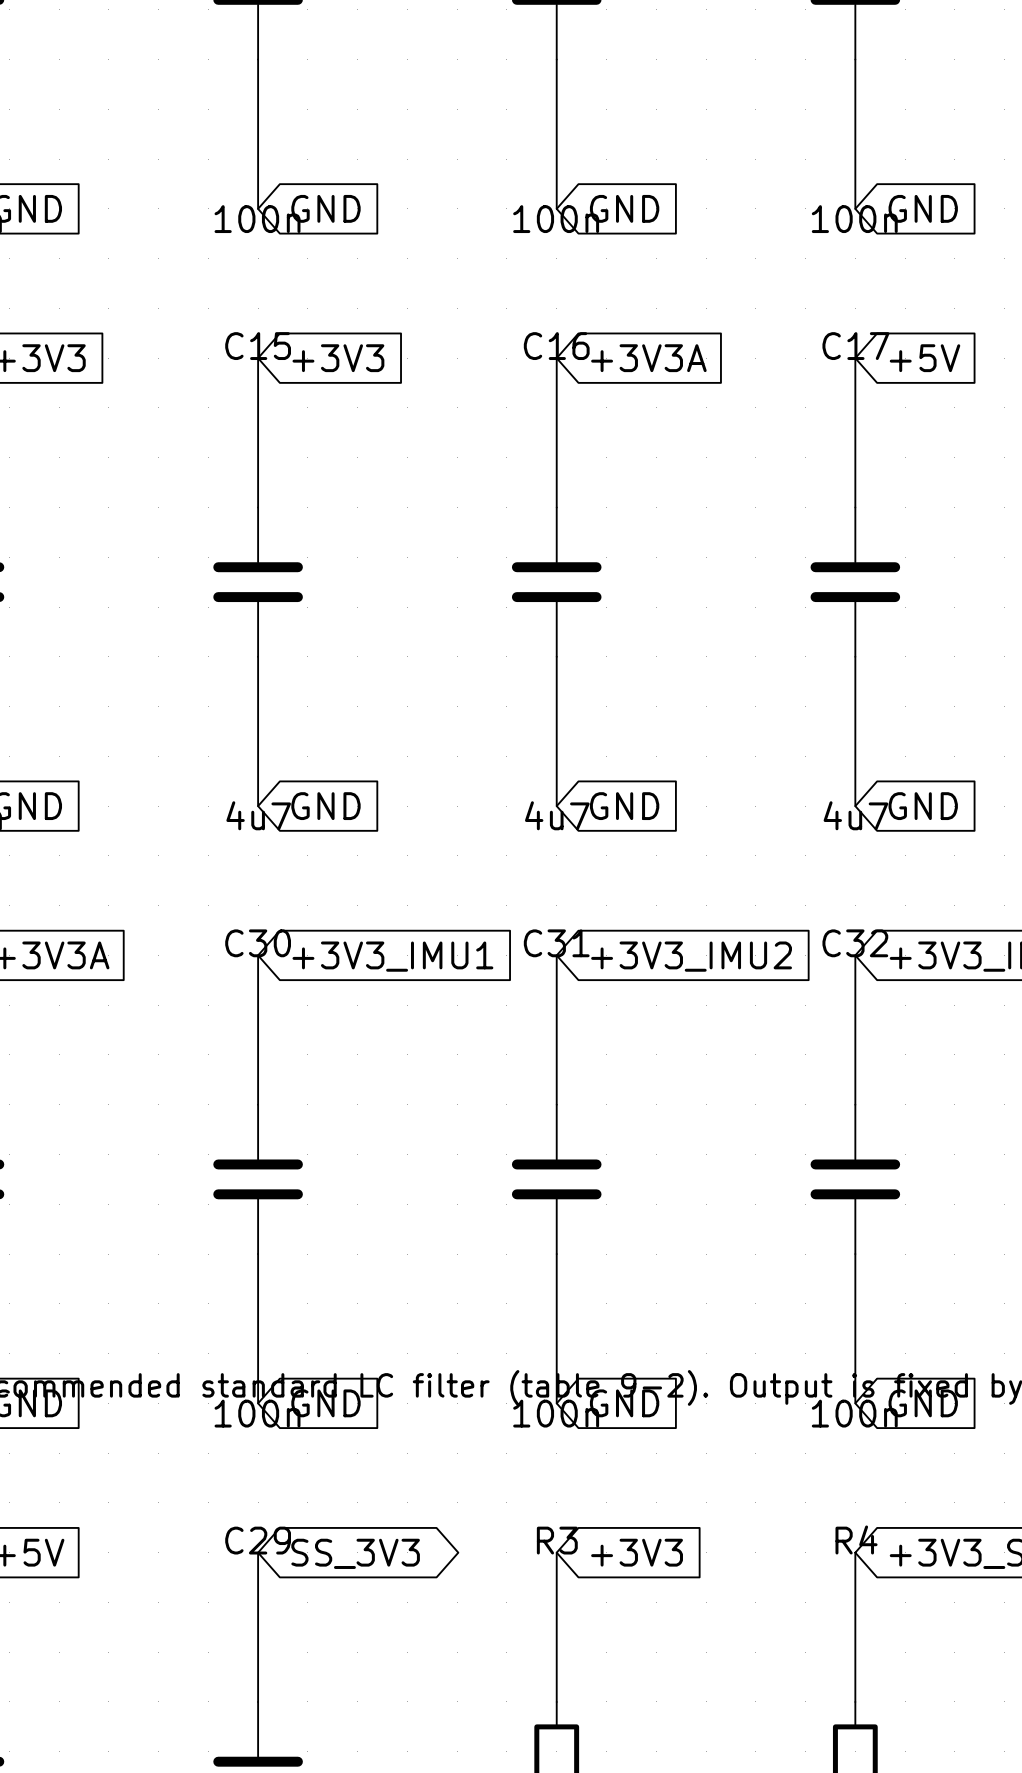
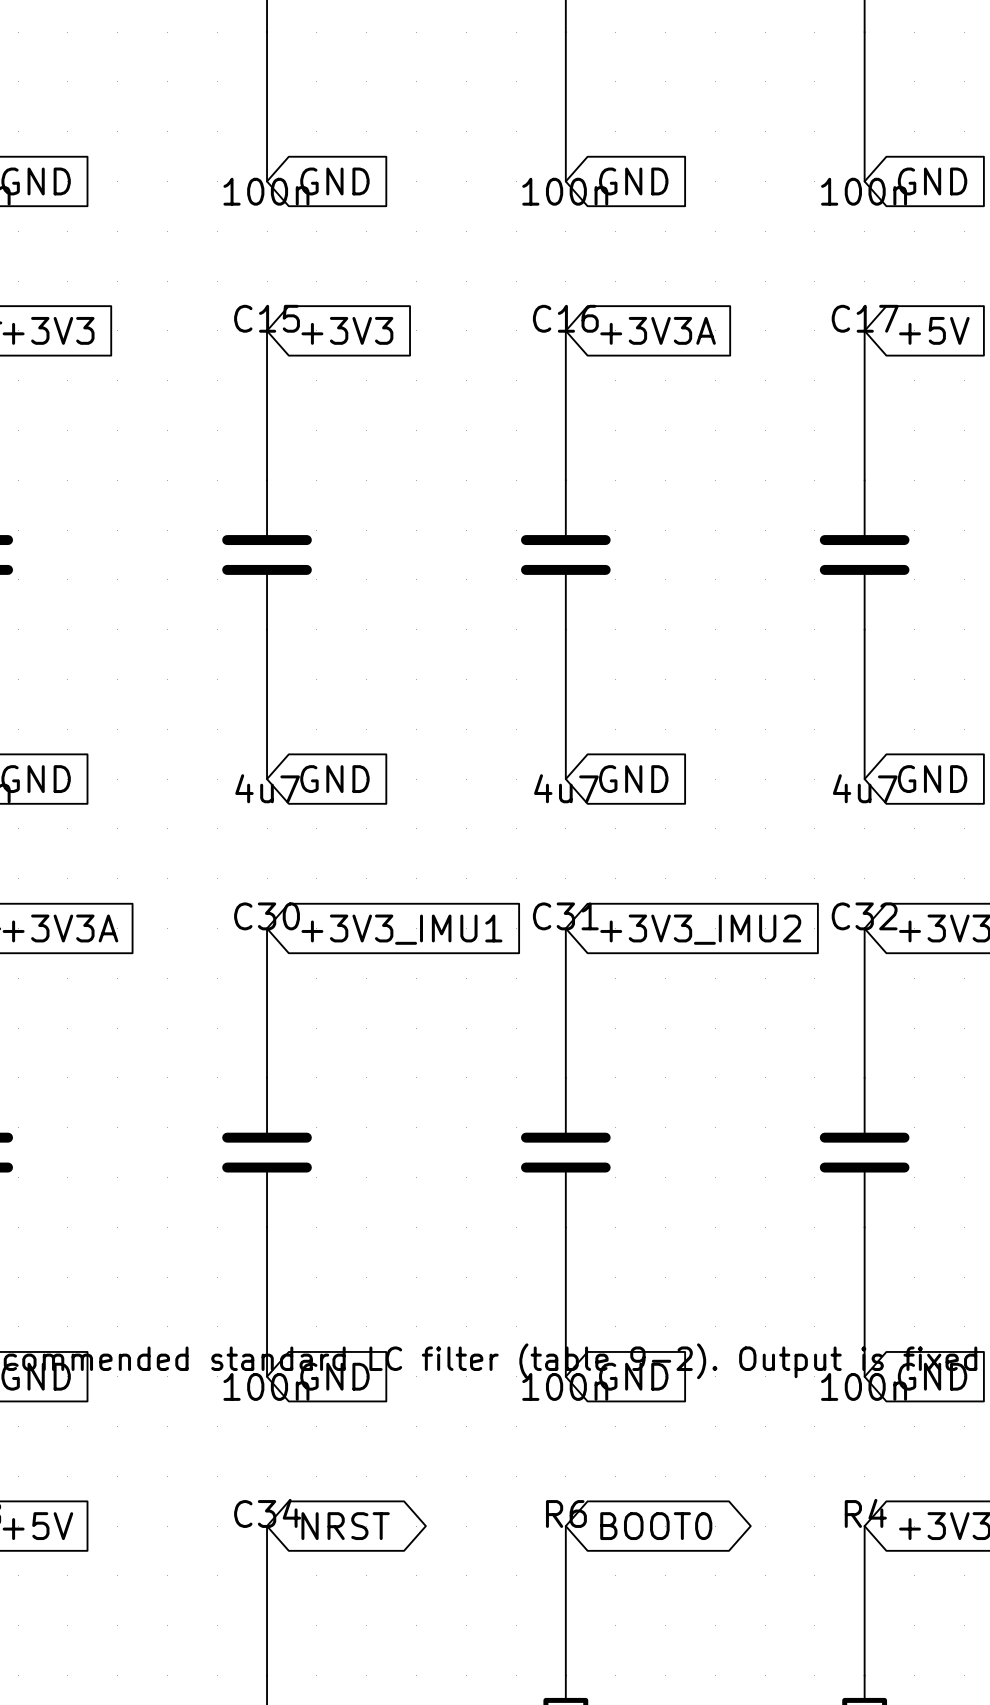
C29 name: C29 (258, 1540) -> C34 (267, 1513)
R3 name: R3 (557, 1540) -> R6 (566, 1514)
global label shape: input (637, 1552) -> bidirectional (656, 1526)
global label: +3V3 (637, 1552) -> BOOT0 (656, 1526)
global label: SS_3V3 (355, 1553) -> NRST (345, 1526)

